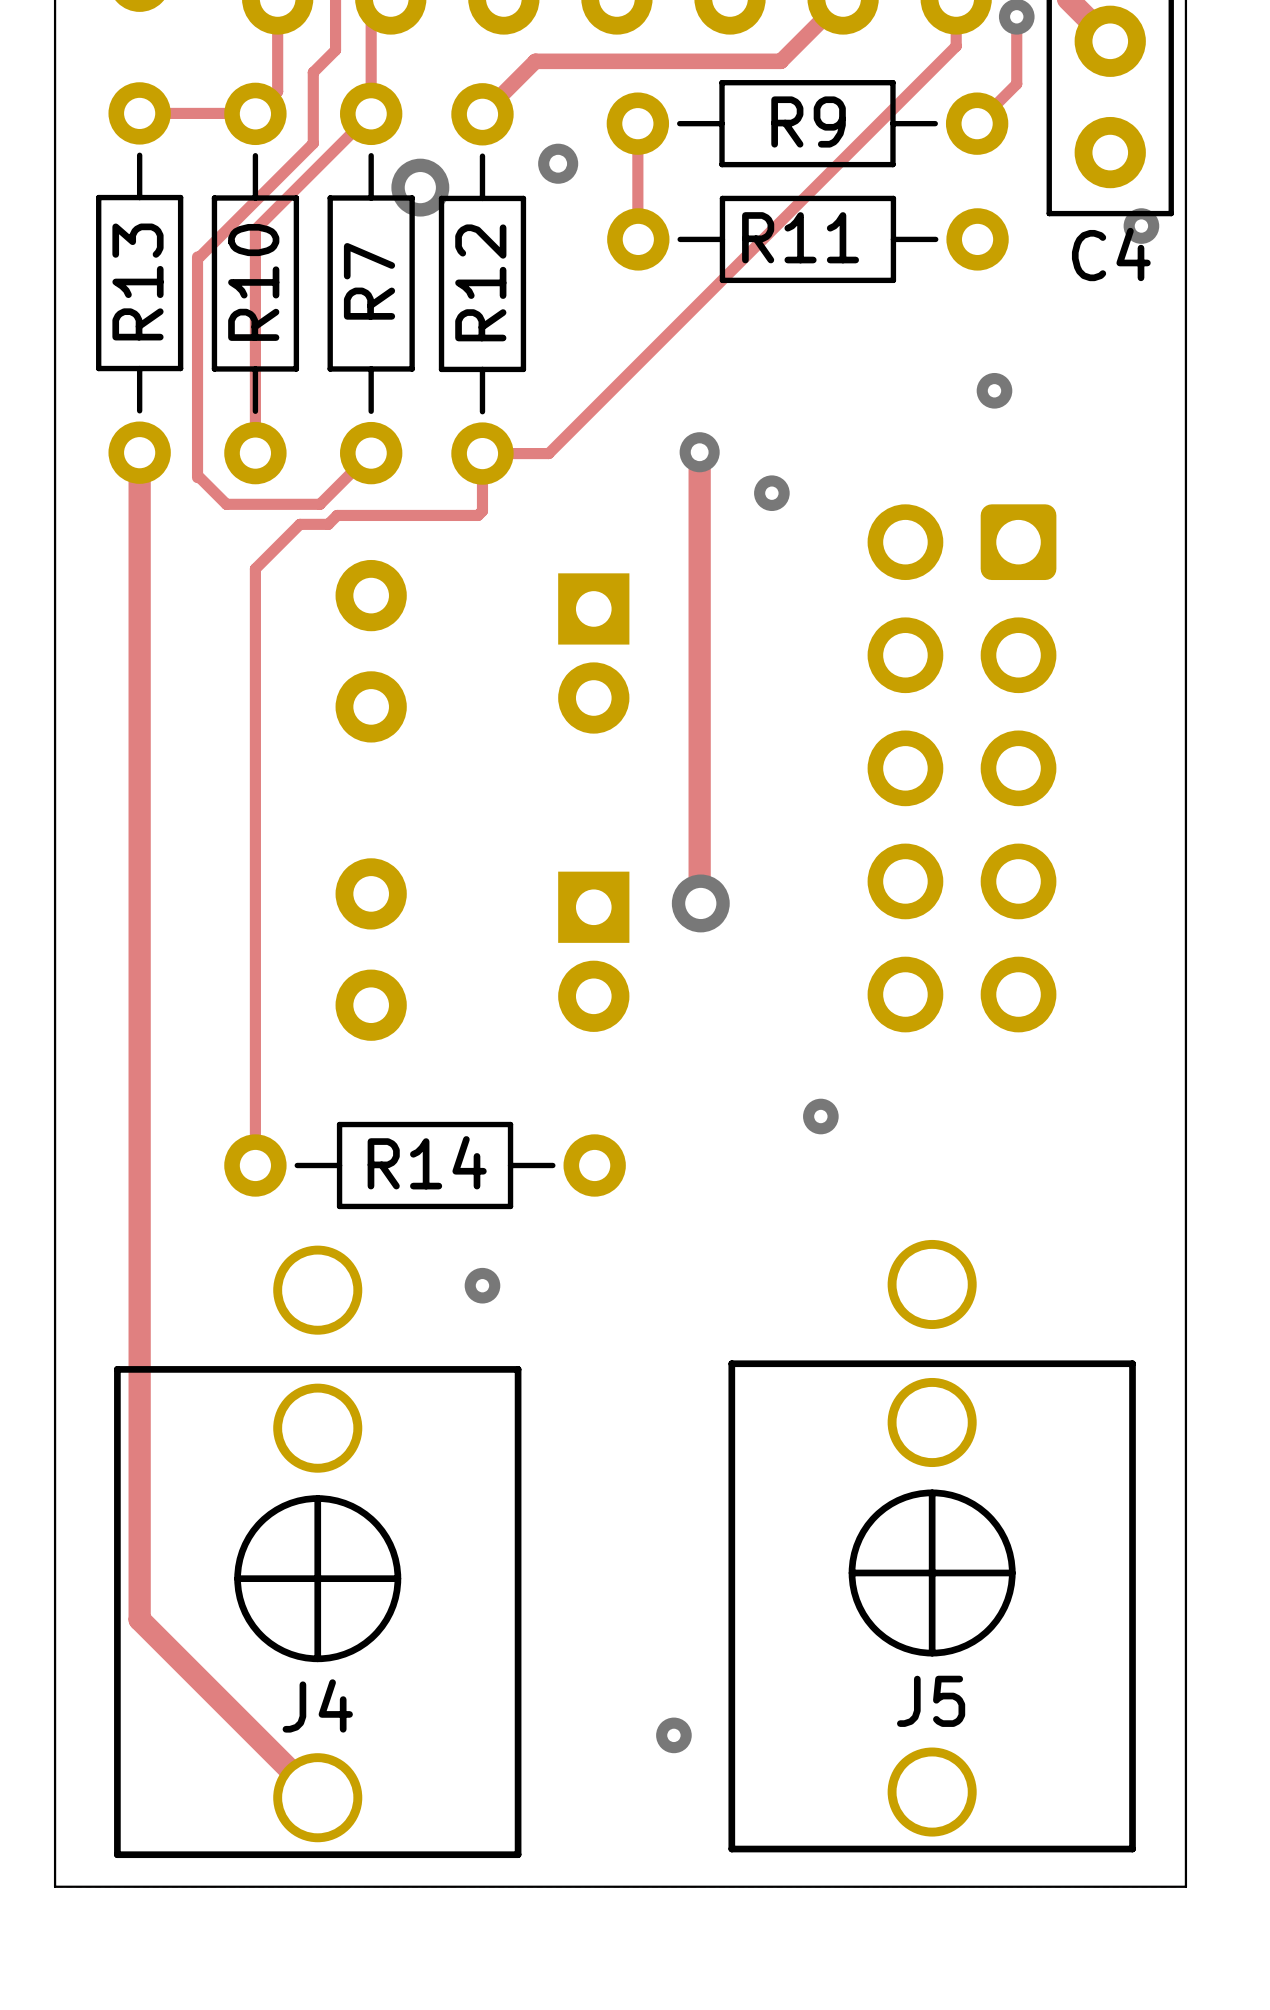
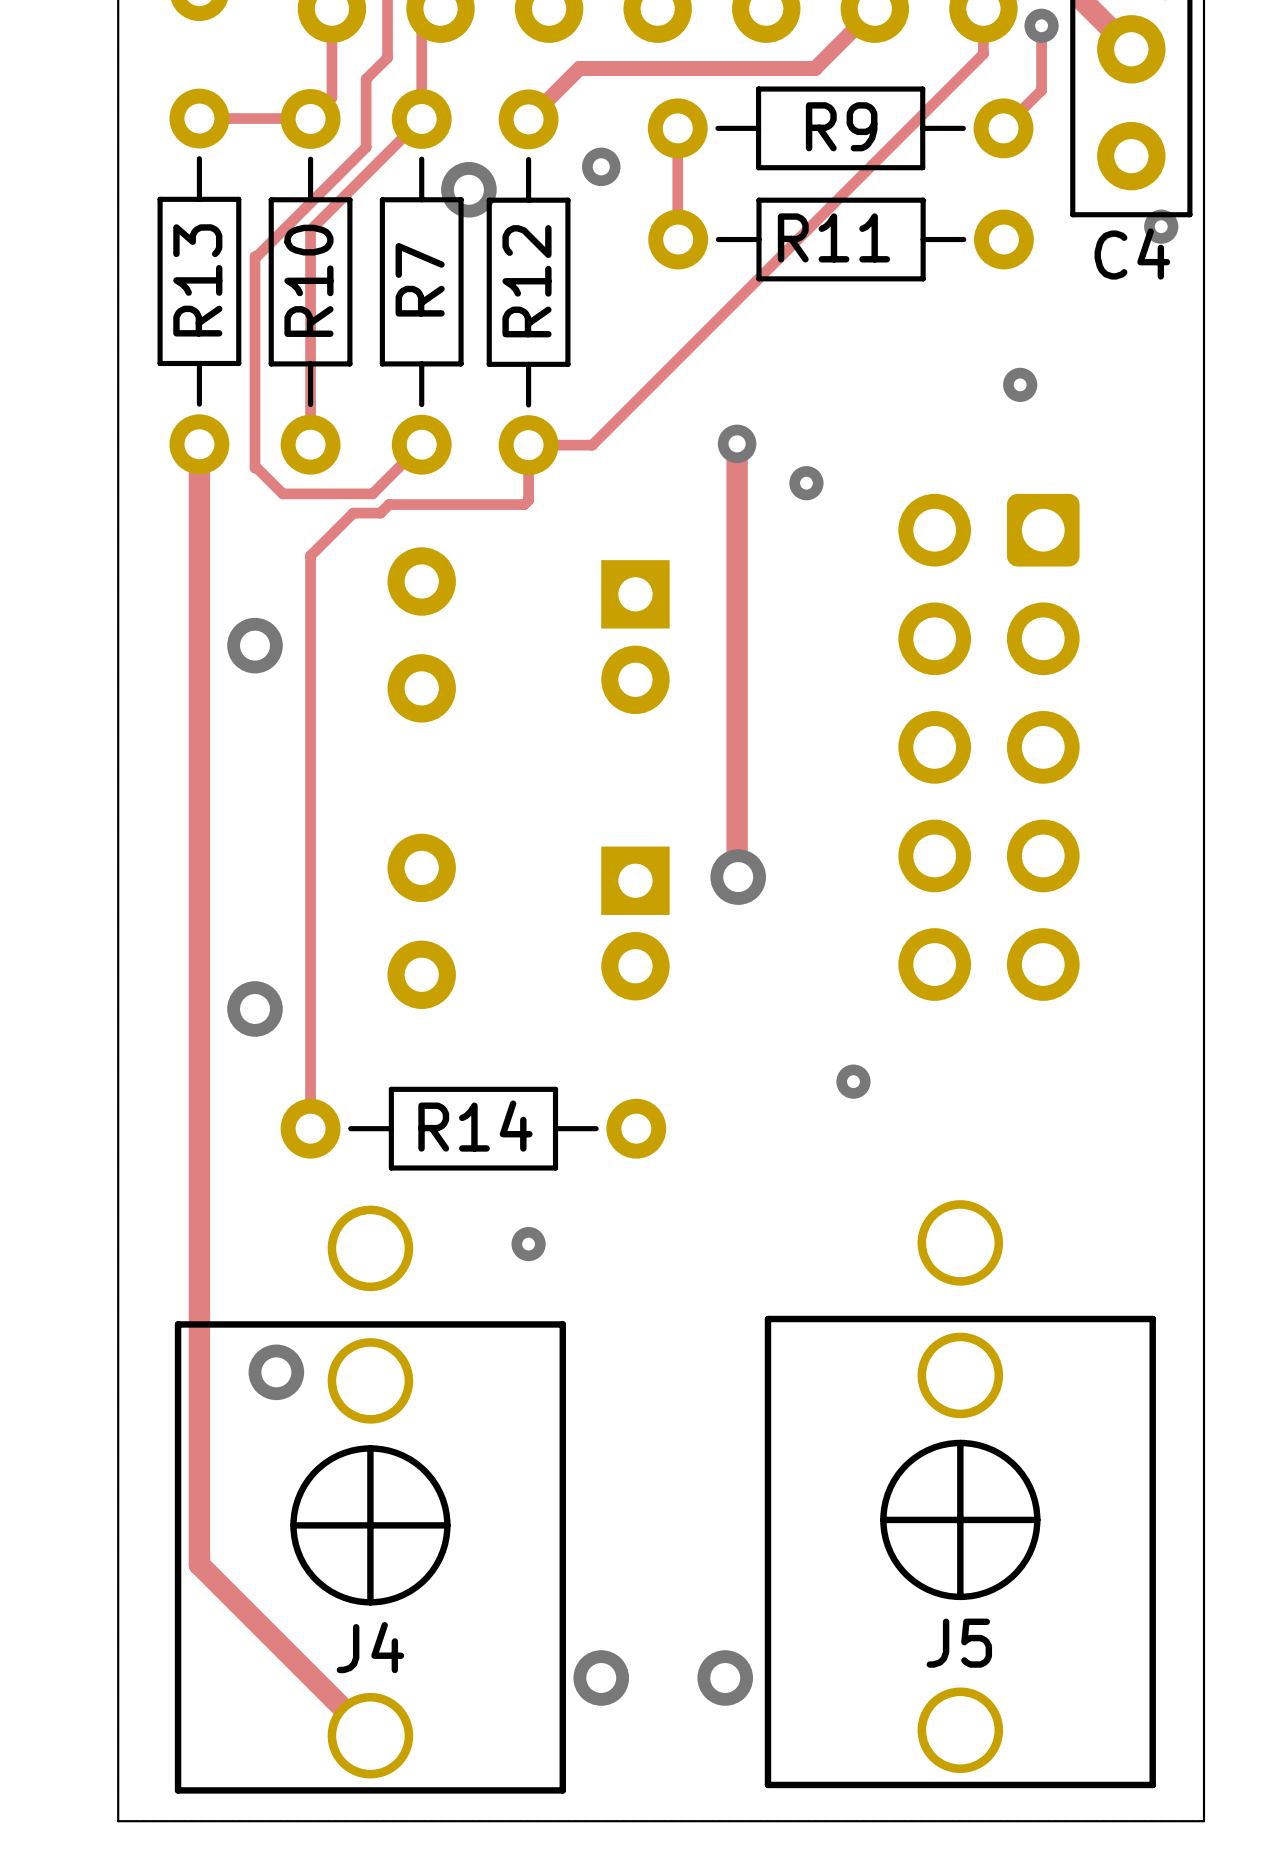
via: none -> (255, 645)
via: none -> (255, 1008)
via: none -> (276, 1372)
via size: [656, 1717, 692, 1754] -> [697, 1650, 754, 1706]
via: none -> (601, 1677)

